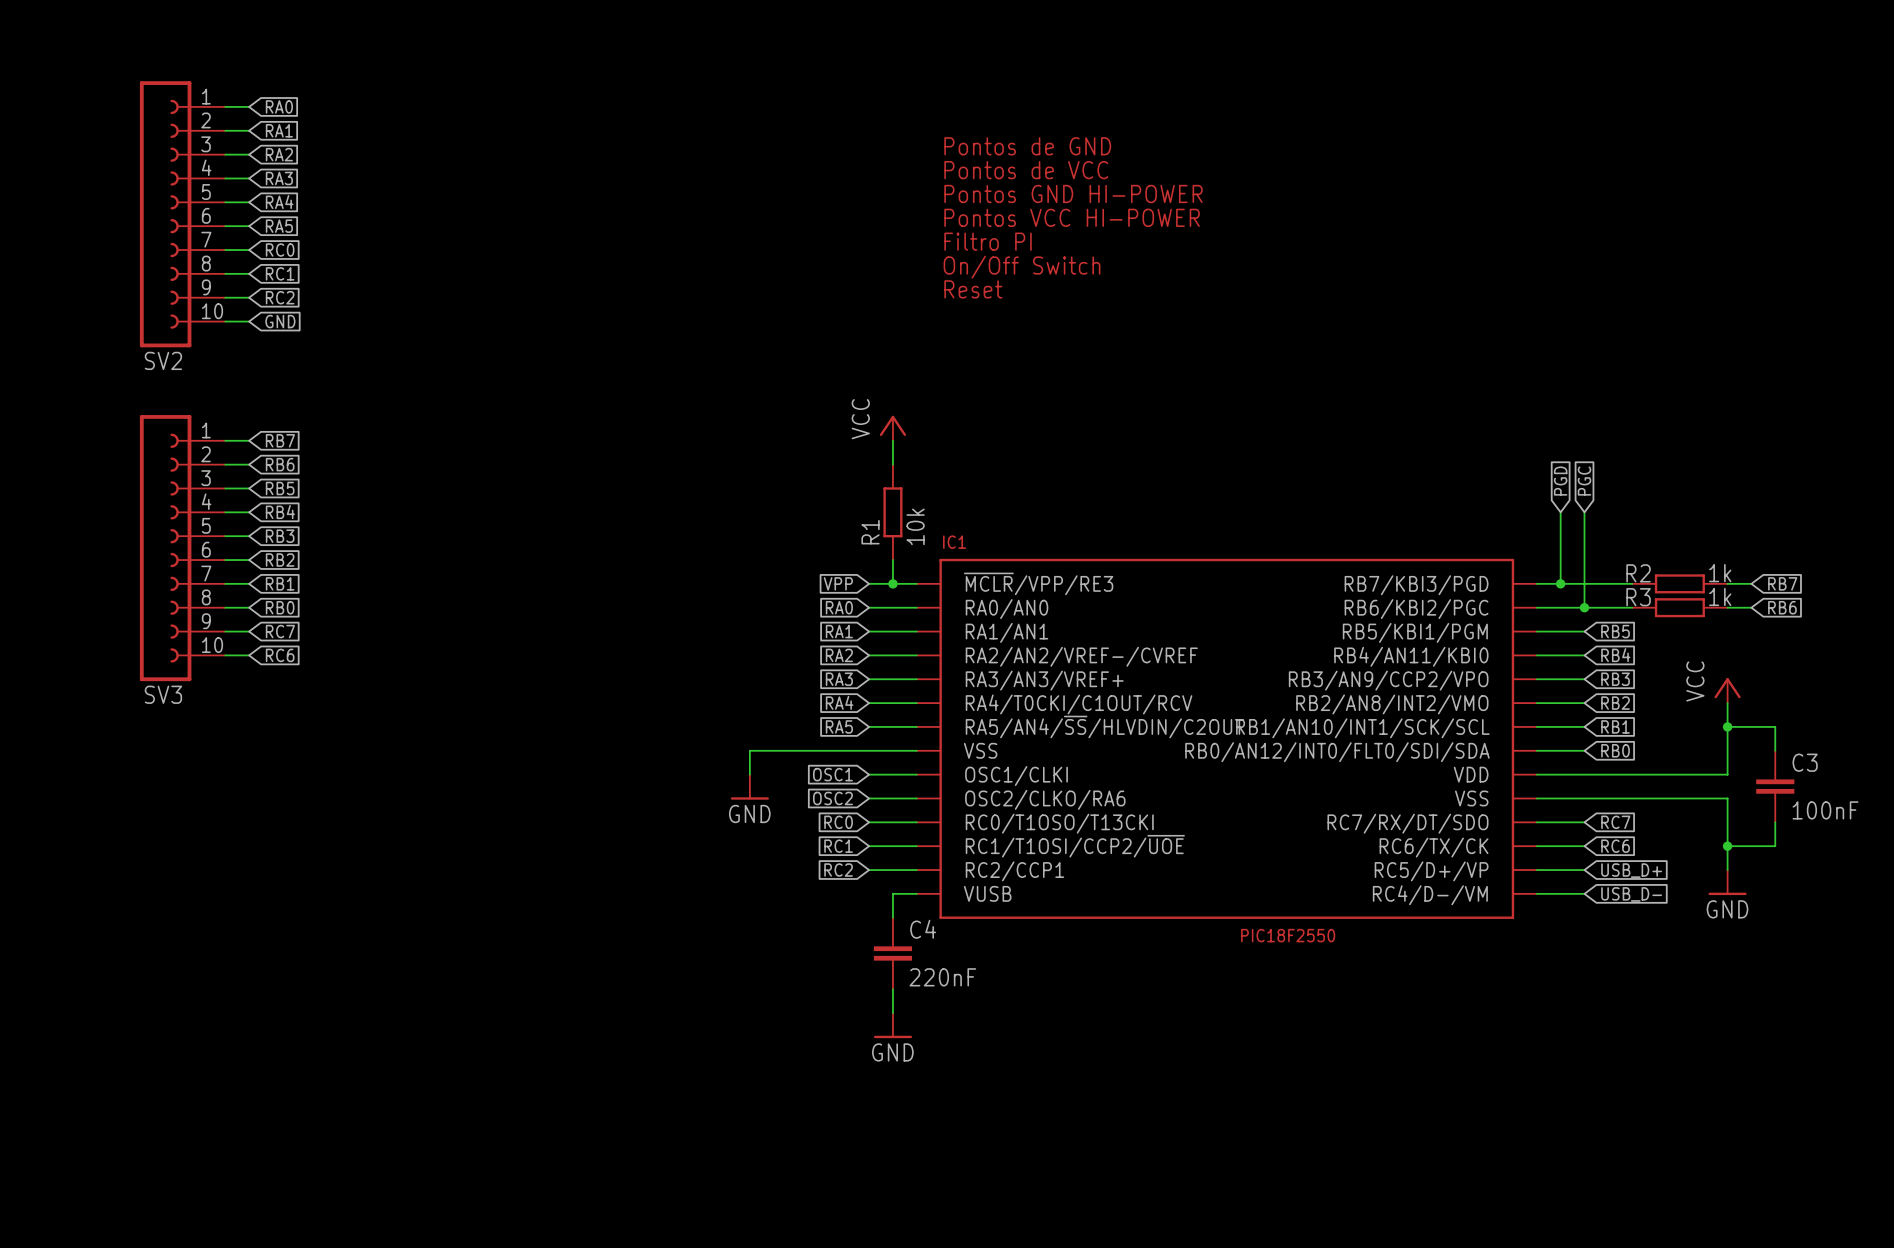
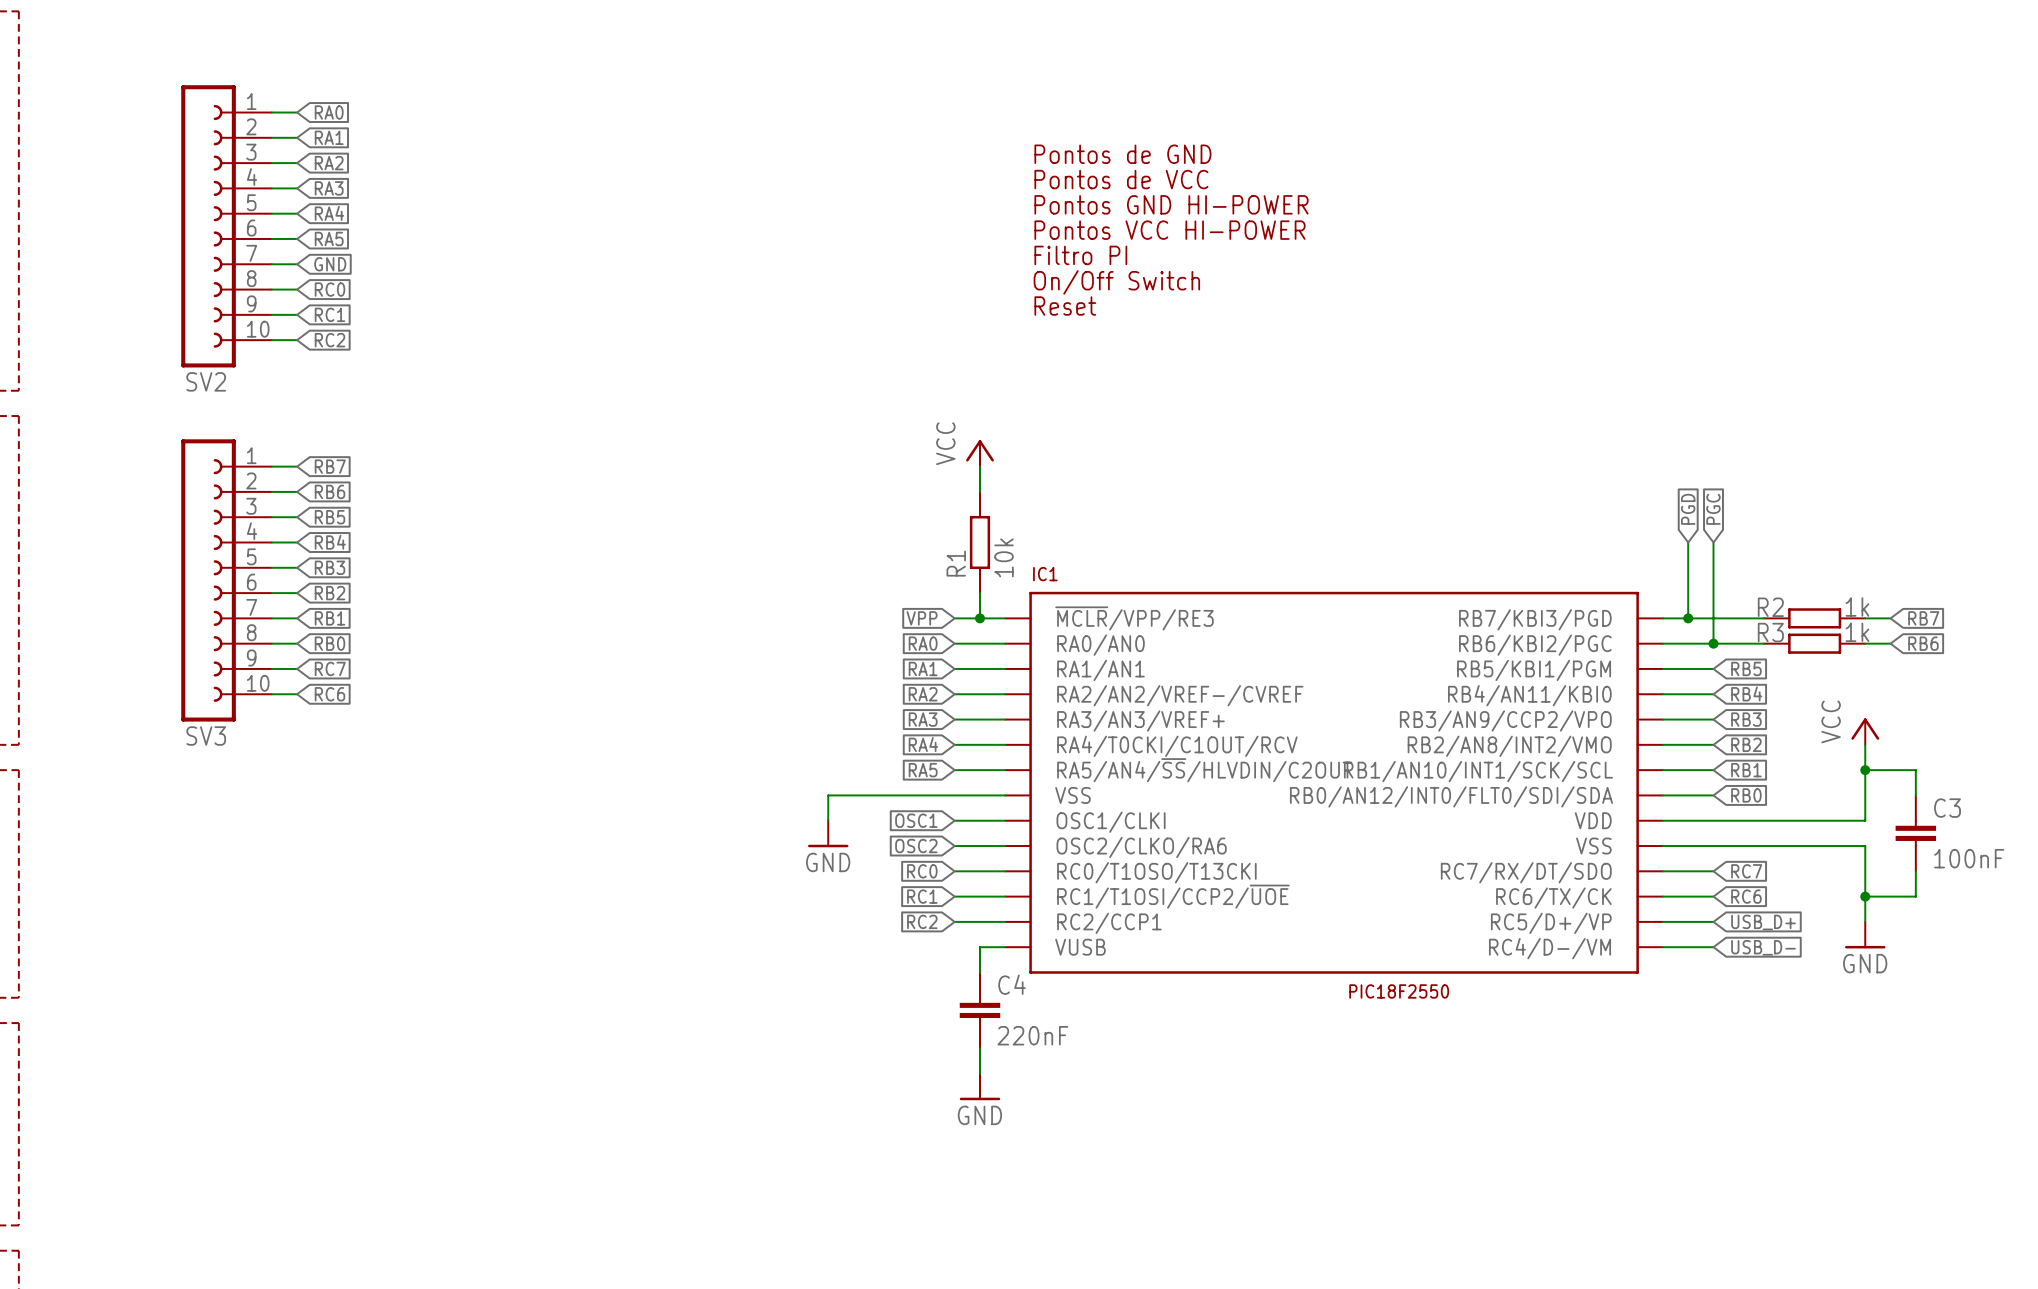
global label: RC0 (280, 250) -> GND (330, 264)
global label: RC1 (280, 273) -> RC0 (329, 289)
global label: RC2 (280, 297) -> RC1 (329, 314)
global label: GND (280, 321) -> RC2 (329, 340)

